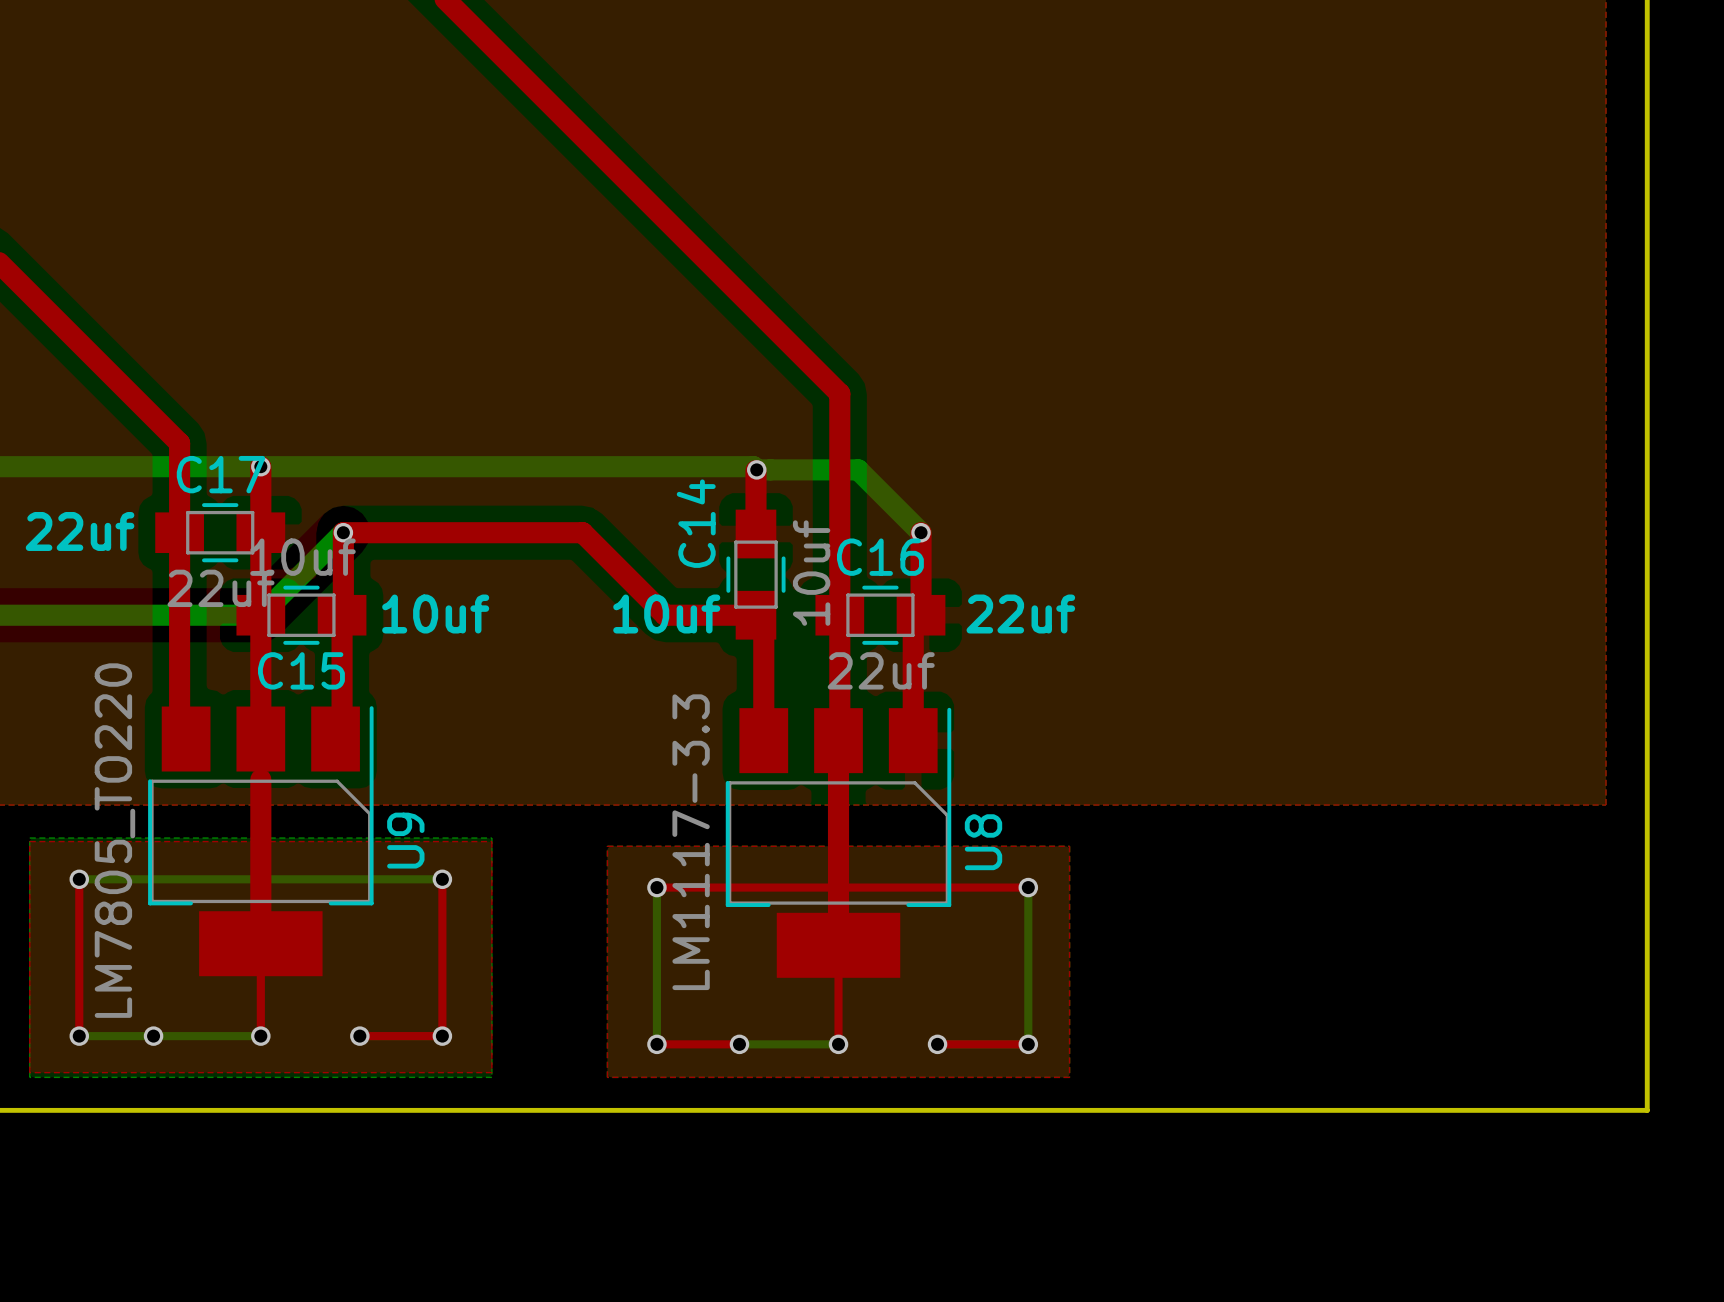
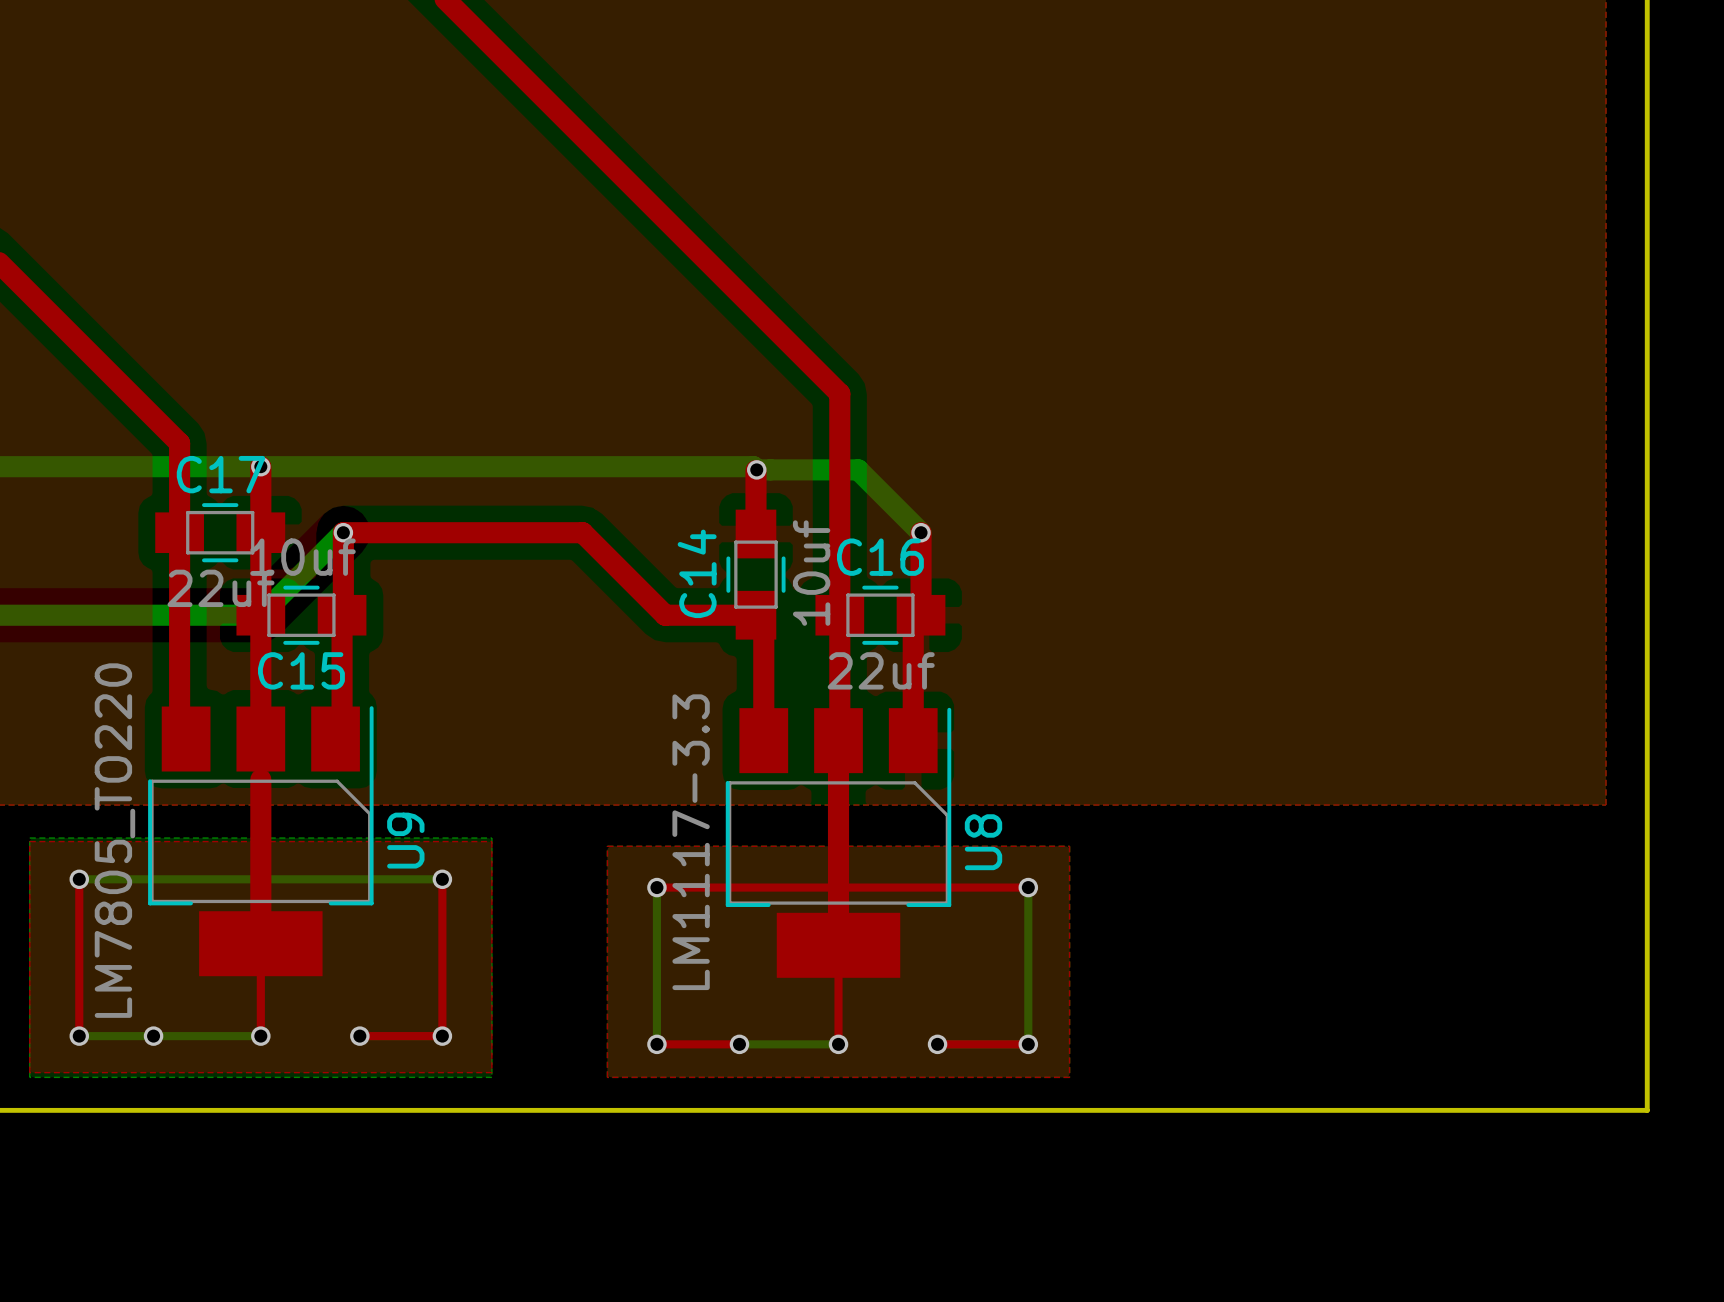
C14 name position: C14 (696, 523) -> C14 (697, 573)
text: 22uf (80, 531) -> none
text: 10uf (435, 614) -> none
text: 10uf (666, 614) -> none
text: 22uf (1020, 614) -> none

